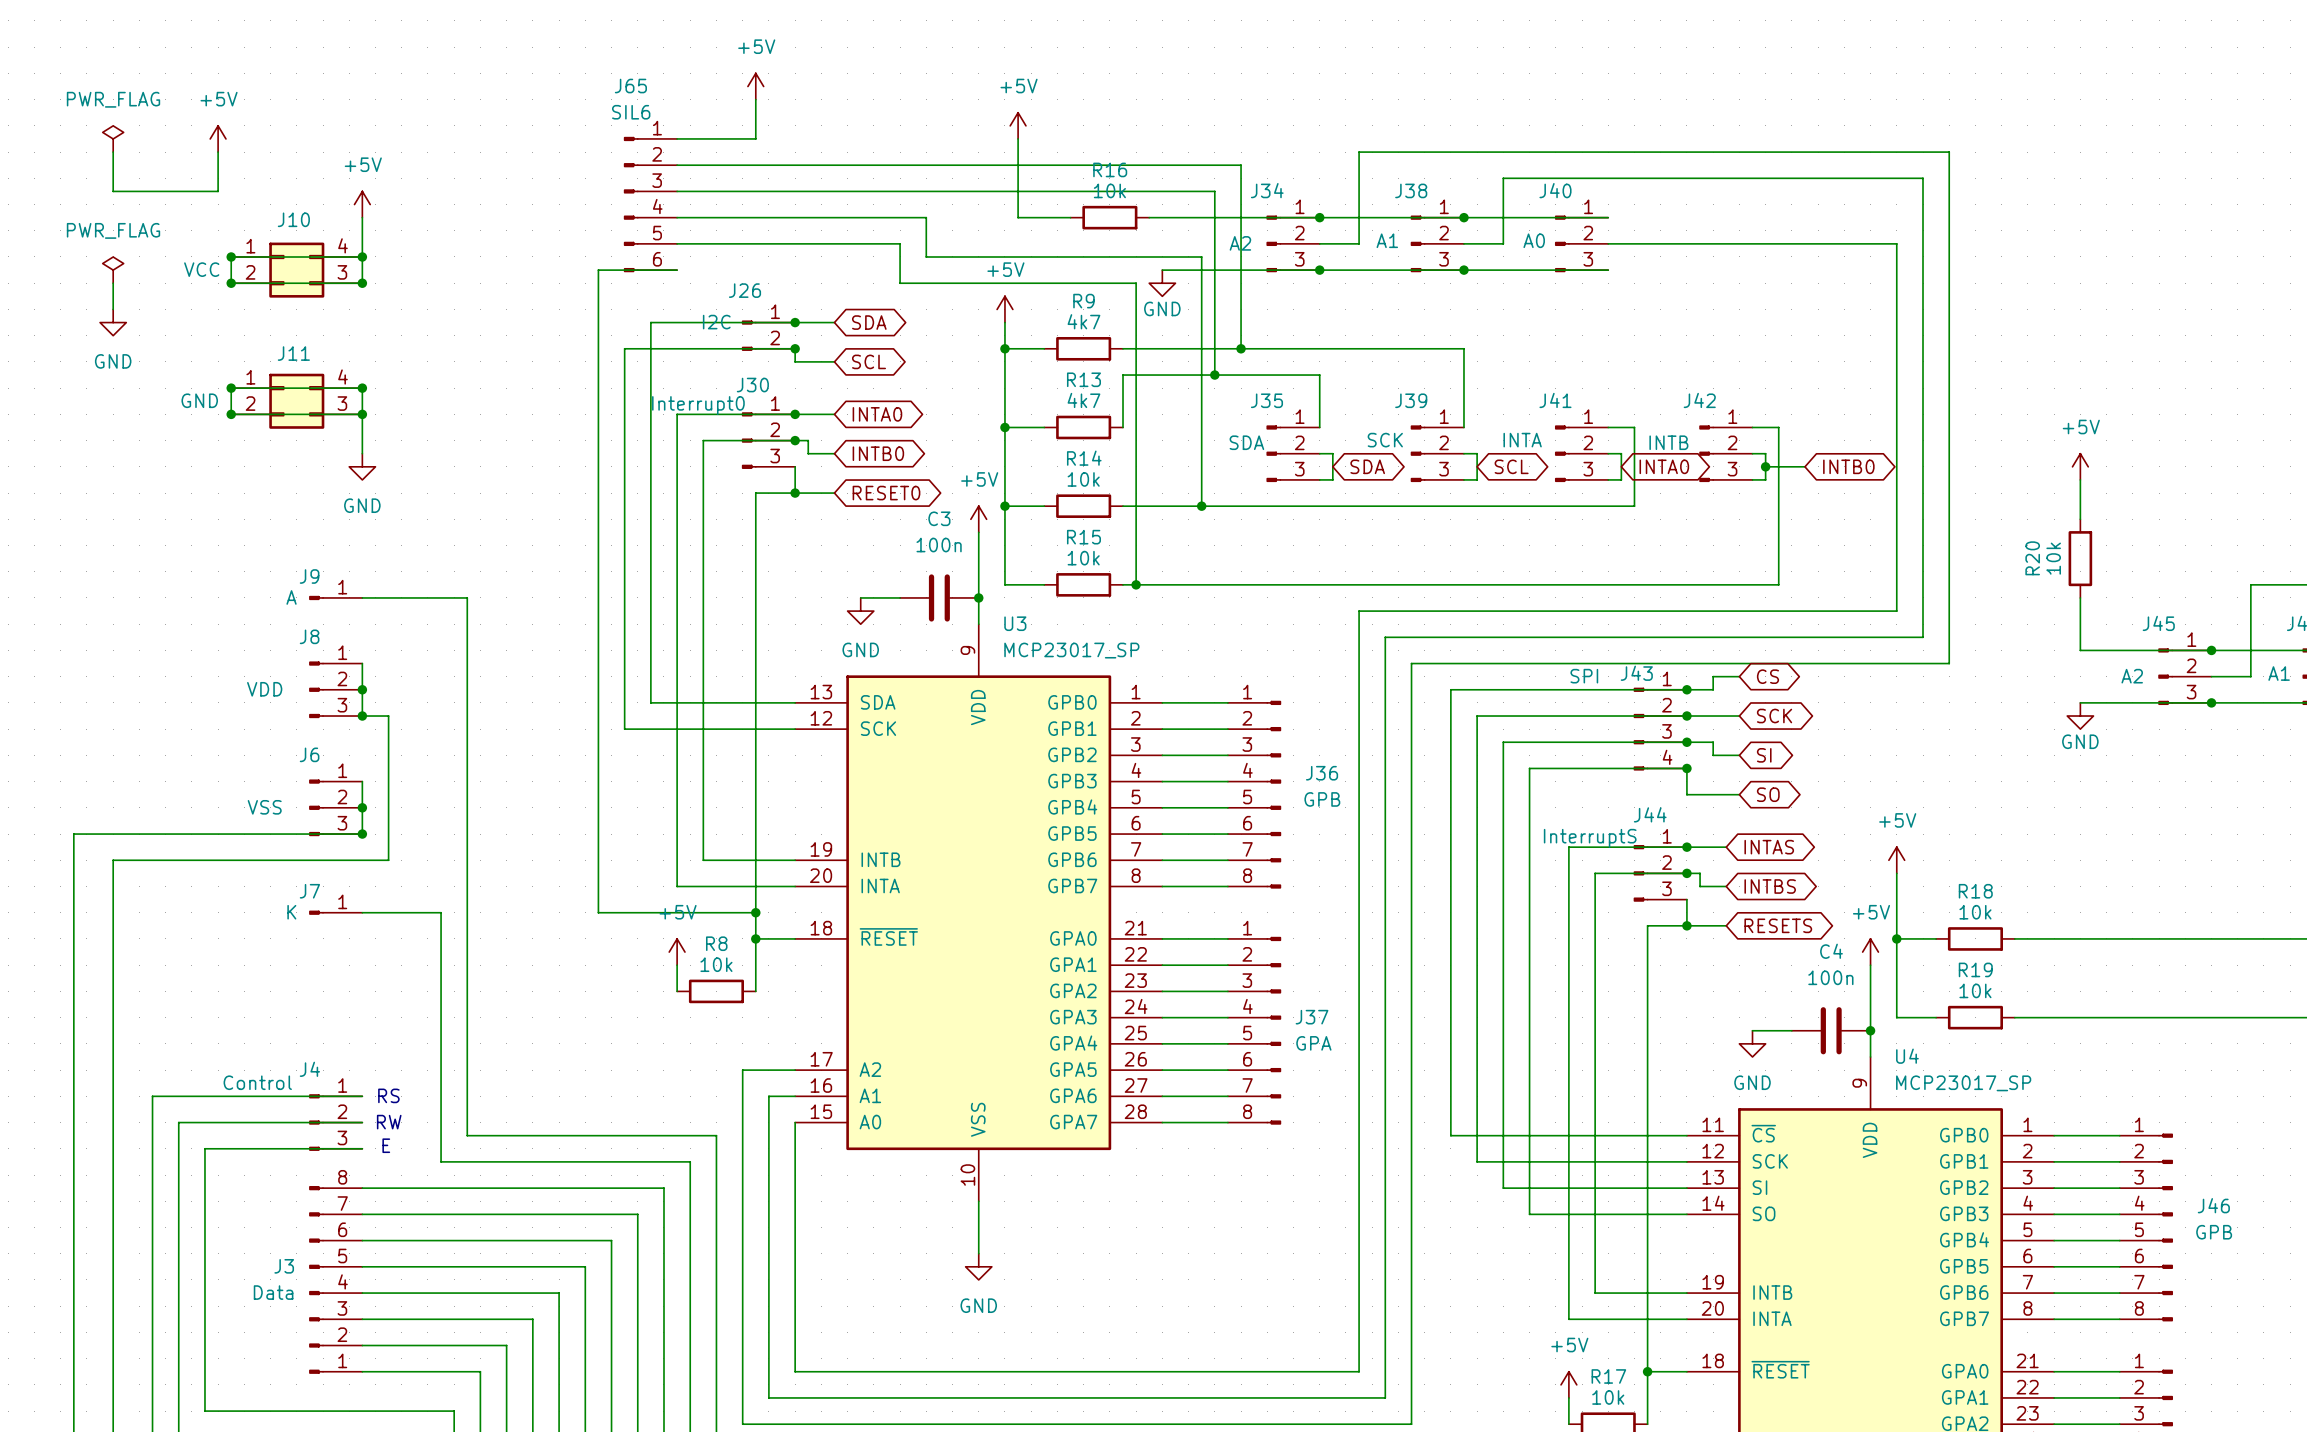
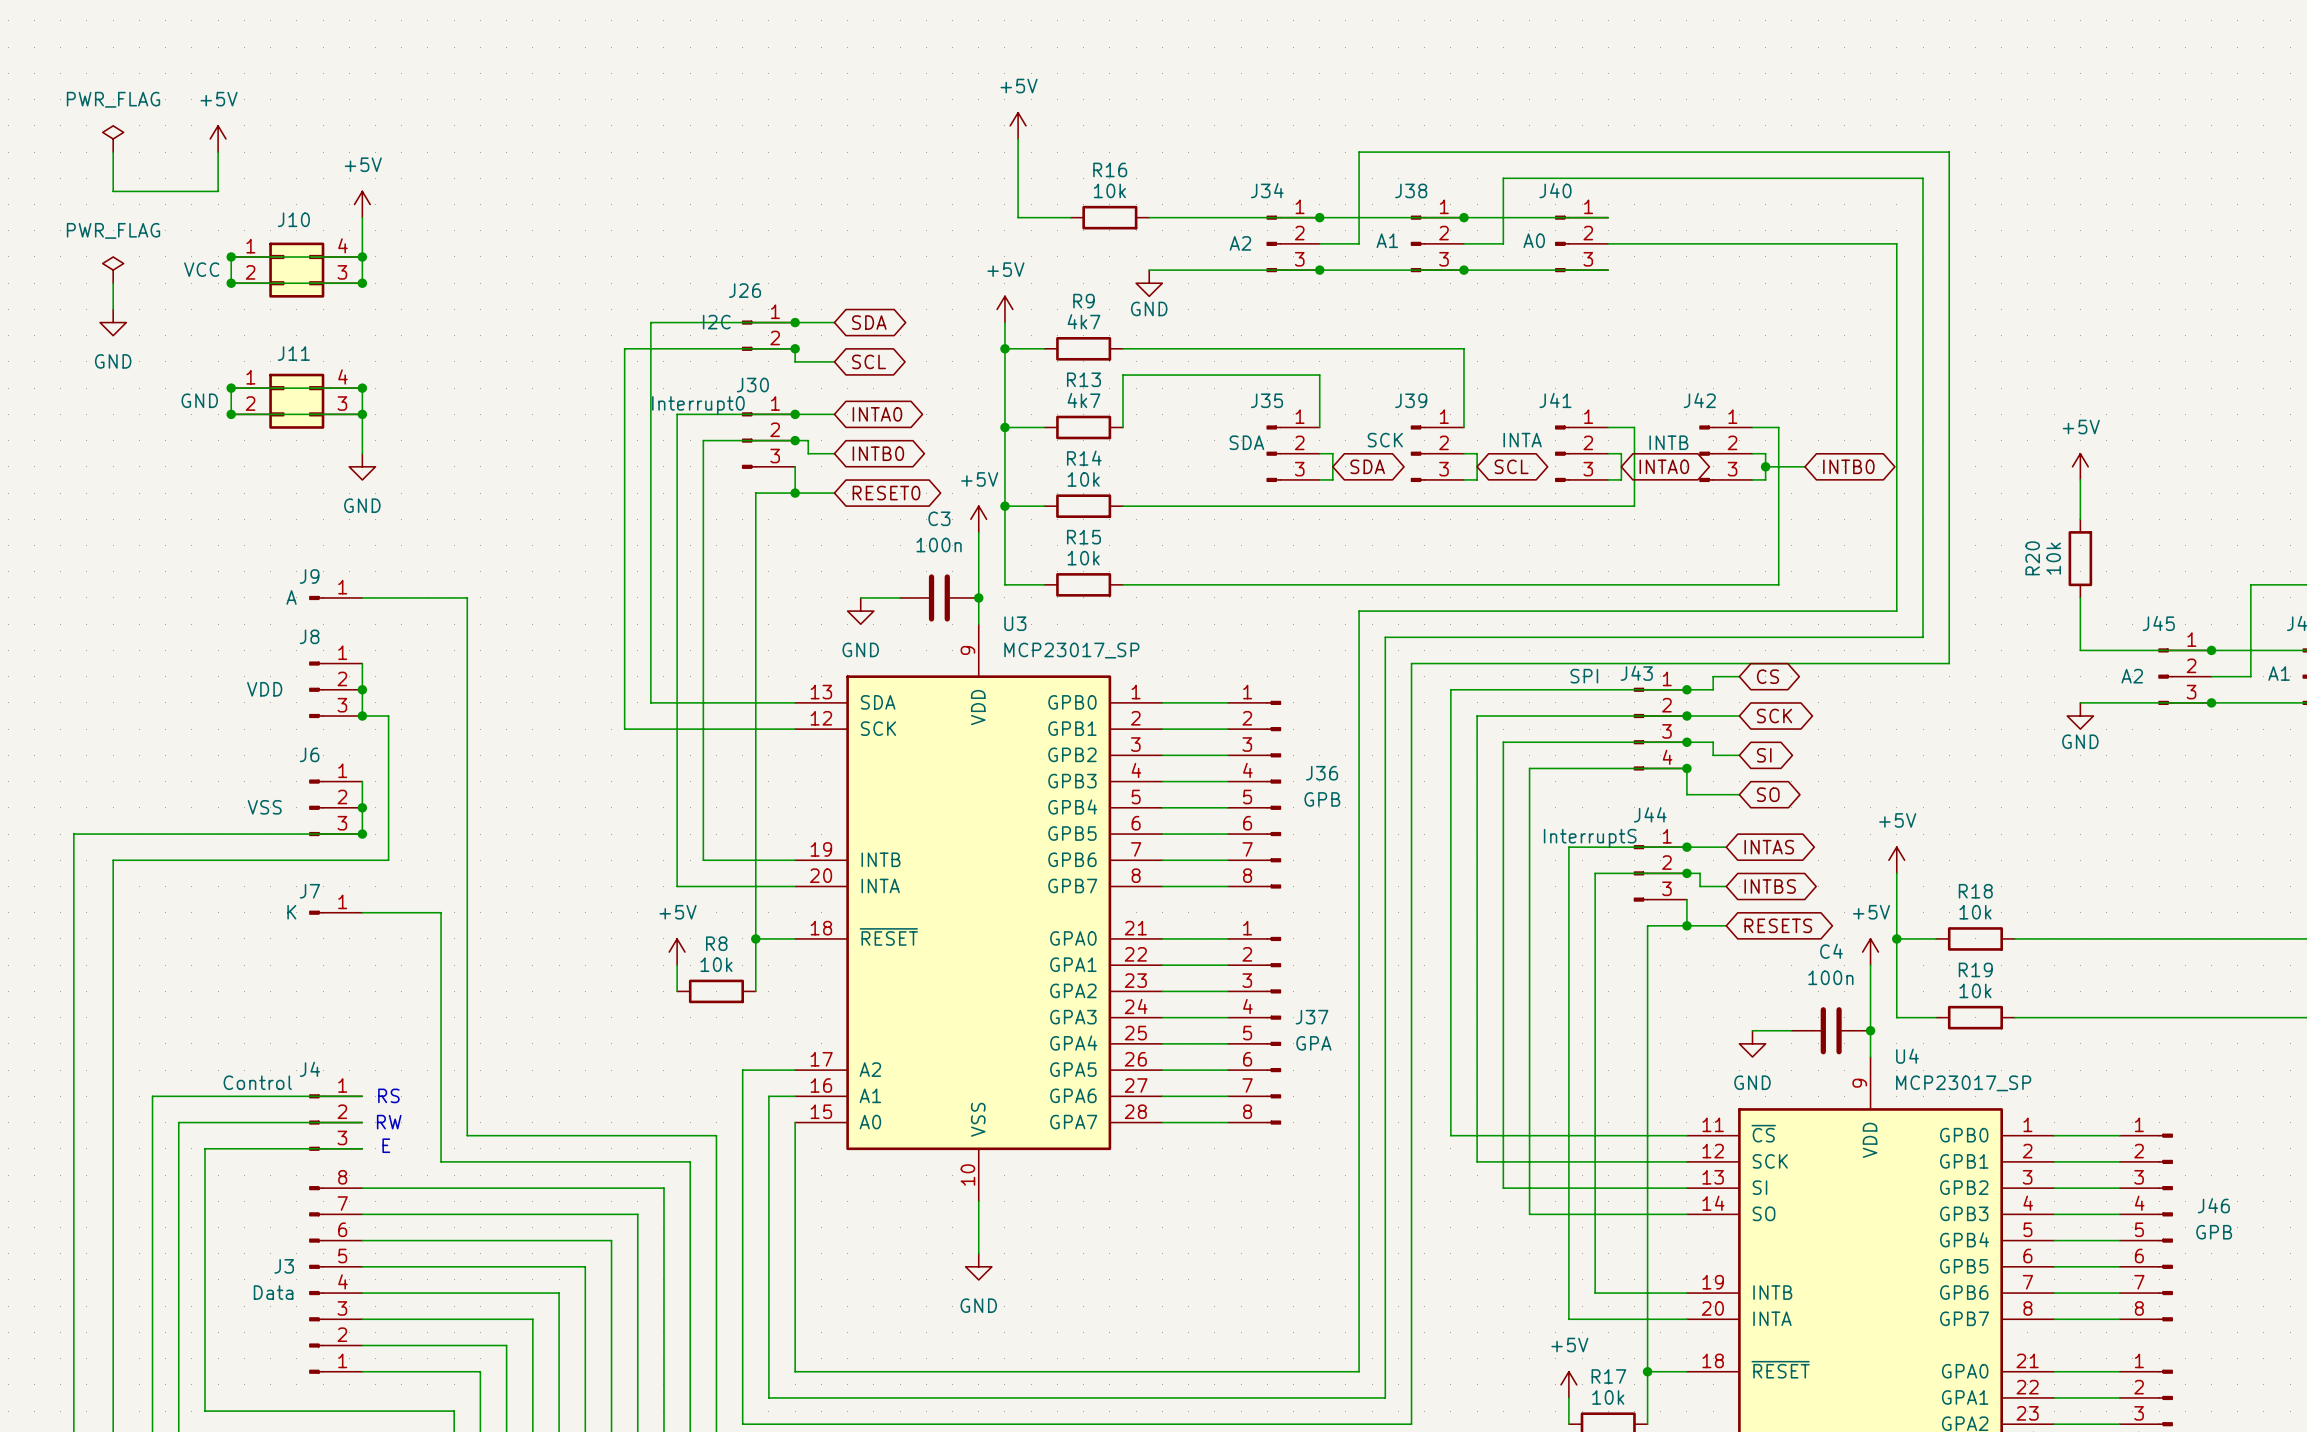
power symbol: +5V (755, 86) -> none
wire: (755, 99) (755, 138) (677, 138) -> none
wire: (677, 165) (1241, 165) (1241, 348) -> none
wire: (677, 191) (1214, 191) (1214, 375) -> none
J65: SIL6 (650, 204) -> none
wire: (677, 217) (926, 217) (926, 256) (1201, 256) (1201, 506) -> none
wire: (677, 243) (900, 243) (900, 283) (1136, 283) (1136, 584) -> none
wire: (677, 270) (598, 270) (598, 912) (755, 912) -> none
wire: none -> (1149, 270) (1162, 270)
power symbol position: GND (1162, 283) -> GND (1149, 283)
junction: (1241, 348) -> none
junction: (1214, 375) -> none
junction: (1201, 506) -> none
junction: (1136, 584) -> none
junction: (755, 912) -> none

